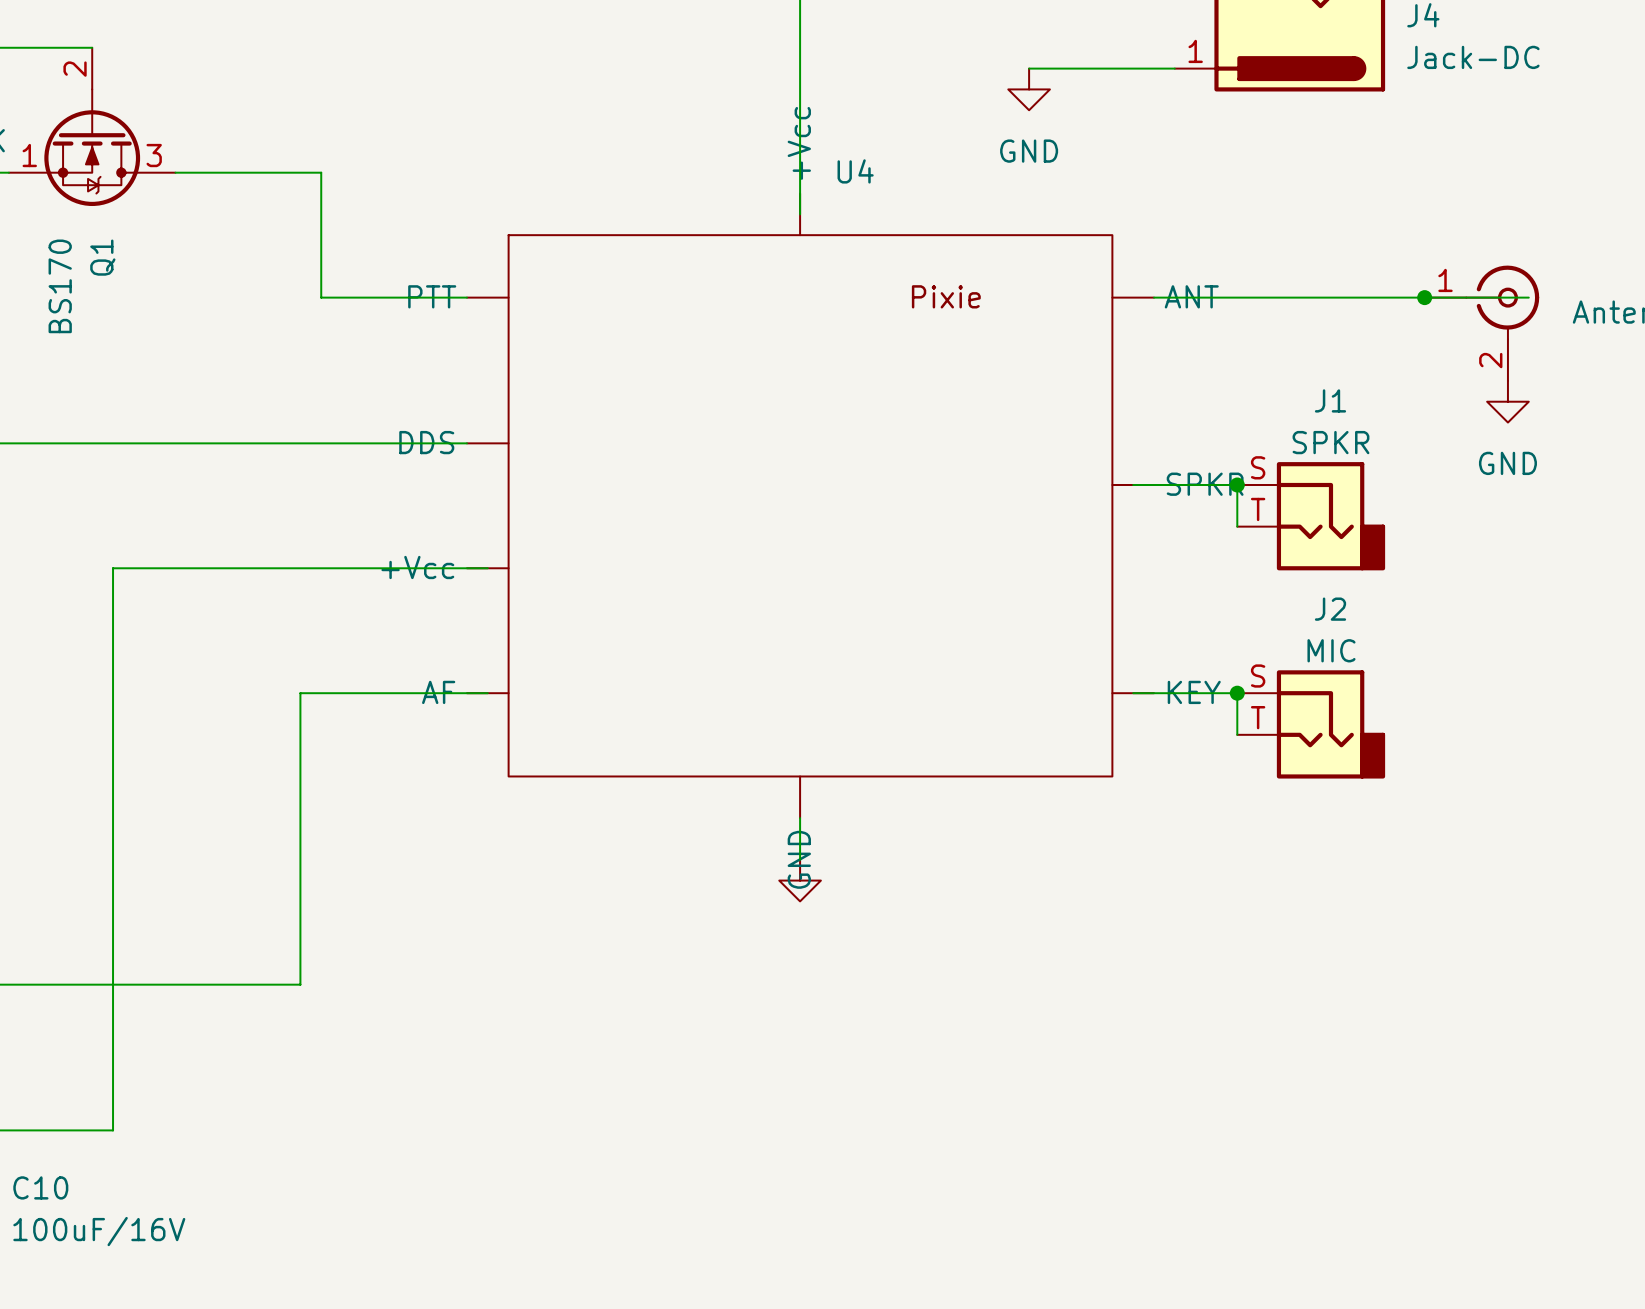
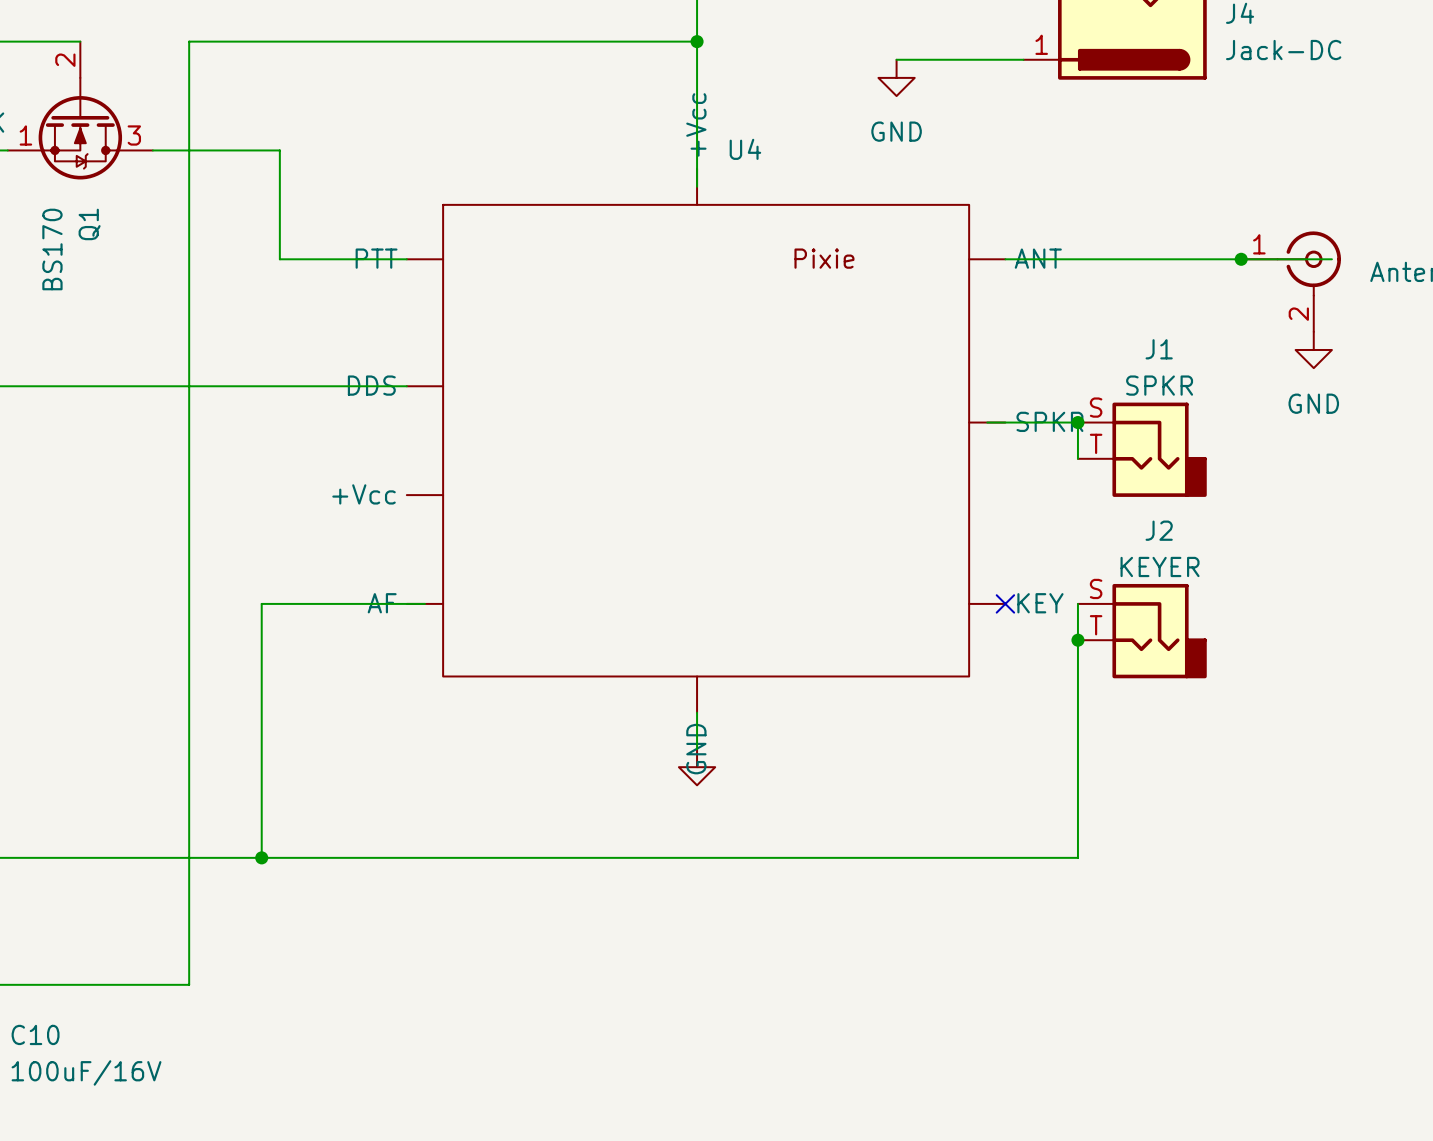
junction: none -> (697, 41)
wire: (487, 568) (113, 568) (113, 1130) -> (697, 41) (189, 41) (189, 984) (98, 984)
J2 value: MIC (1331, 650) -> KEYER (1160, 566)
wire: (1133, 693) (1237, 693) -> none
no-connect mark: none -> (1005, 603)
junction position: (1237, 693) -> (1077, 640)
wire: none -> (1077, 640) (1077, 857) (261, 857)
junction: none -> (261, 857)

